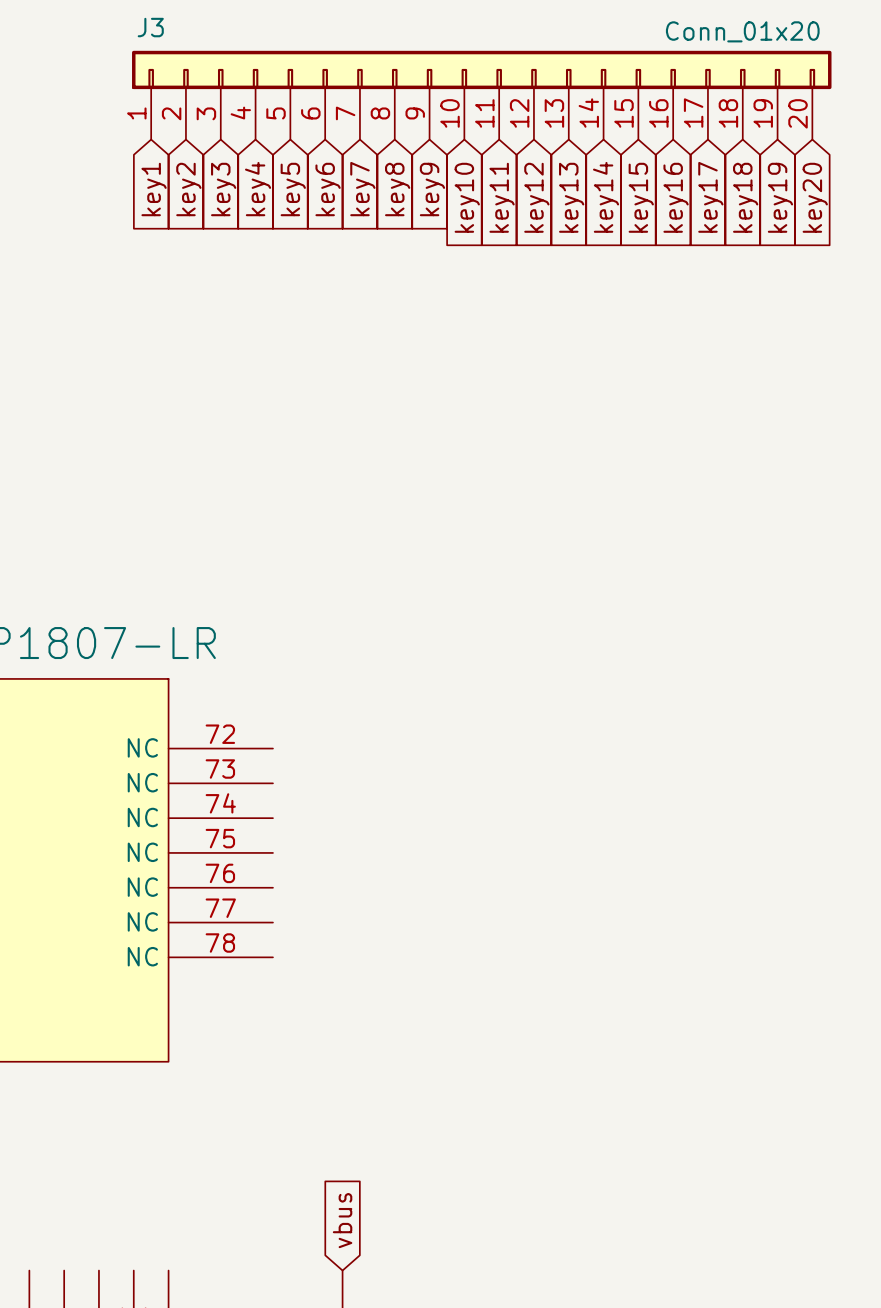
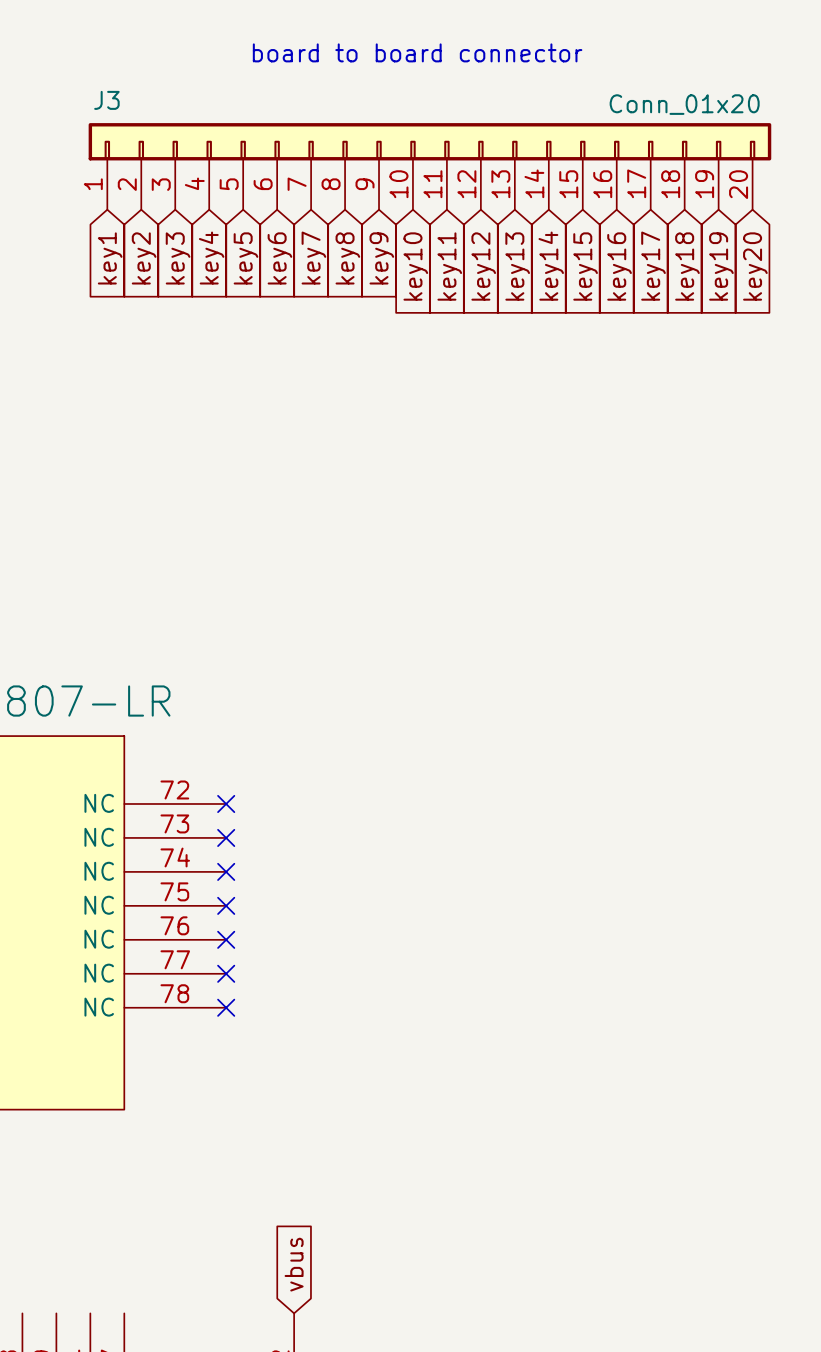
no-connect mark: none -> (226, 803)
no-connect mark: none -> (226, 837)
no-connect mark: none -> (226, 871)
no-connect mark: none -> (226, 905)
no-connect mark: none -> (226, 939)
no-connect mark: none -> (226, 973)
no-connect mark: none -> (226, 1007)

